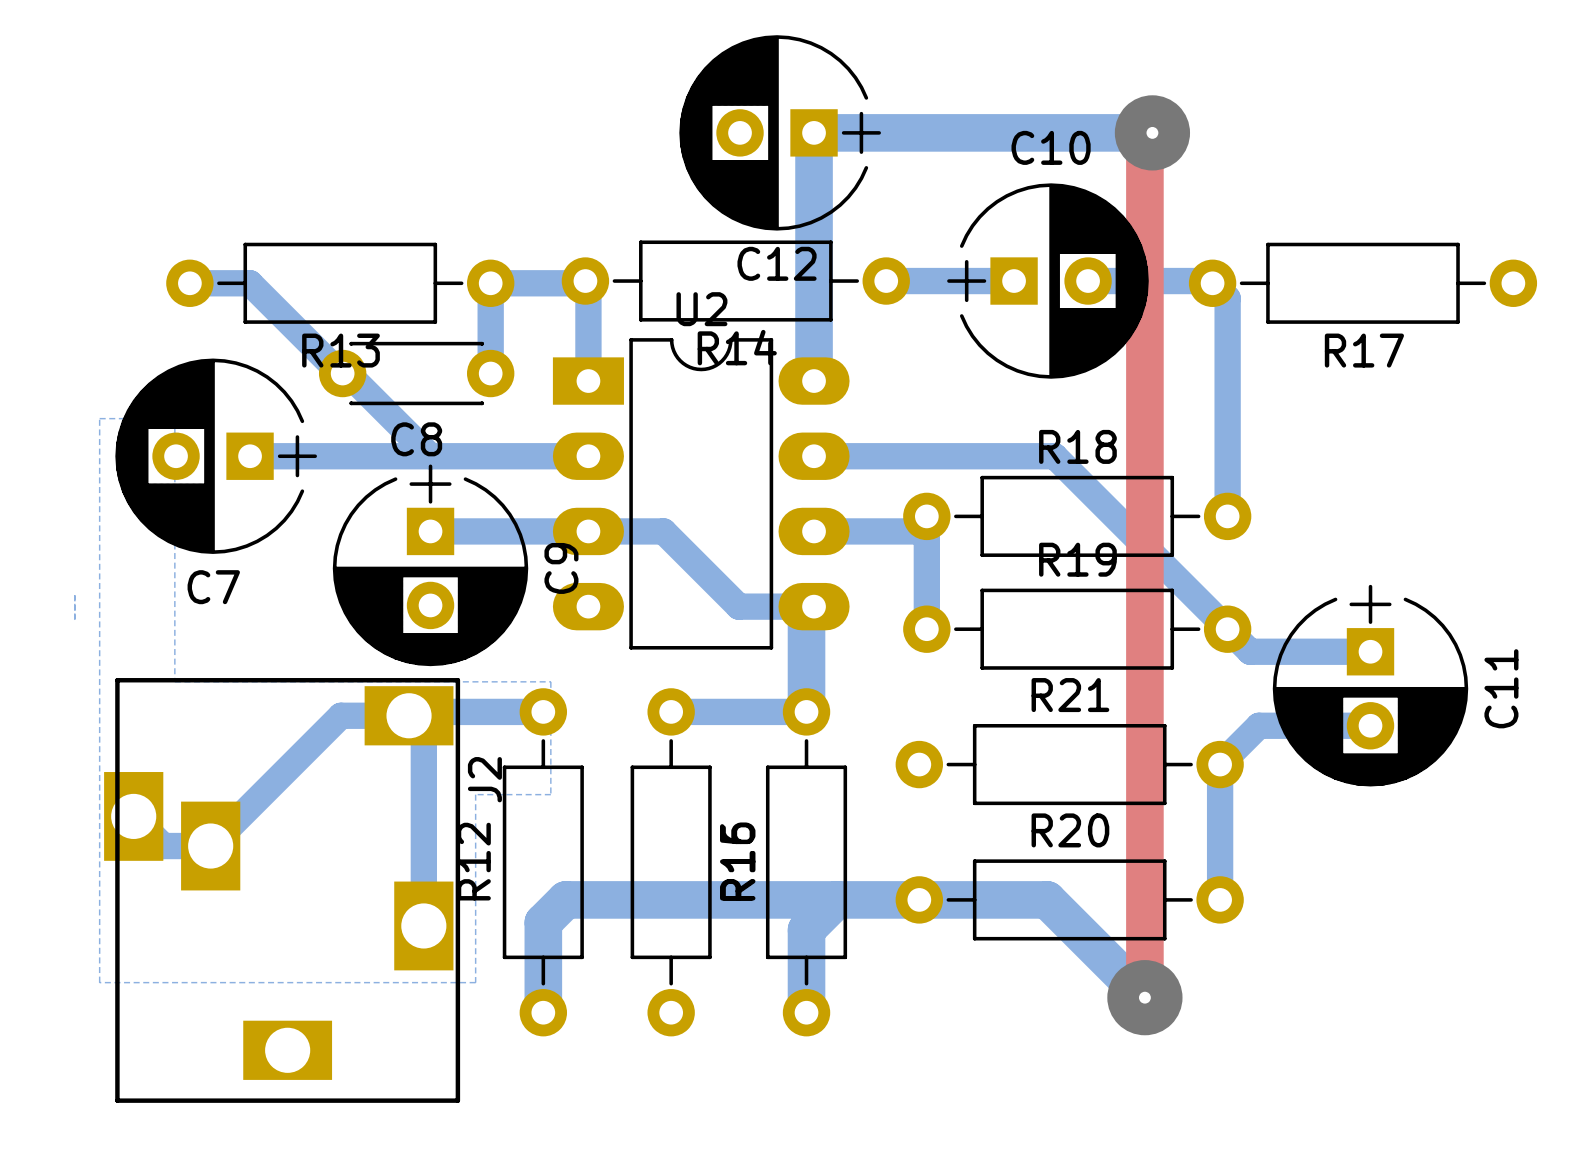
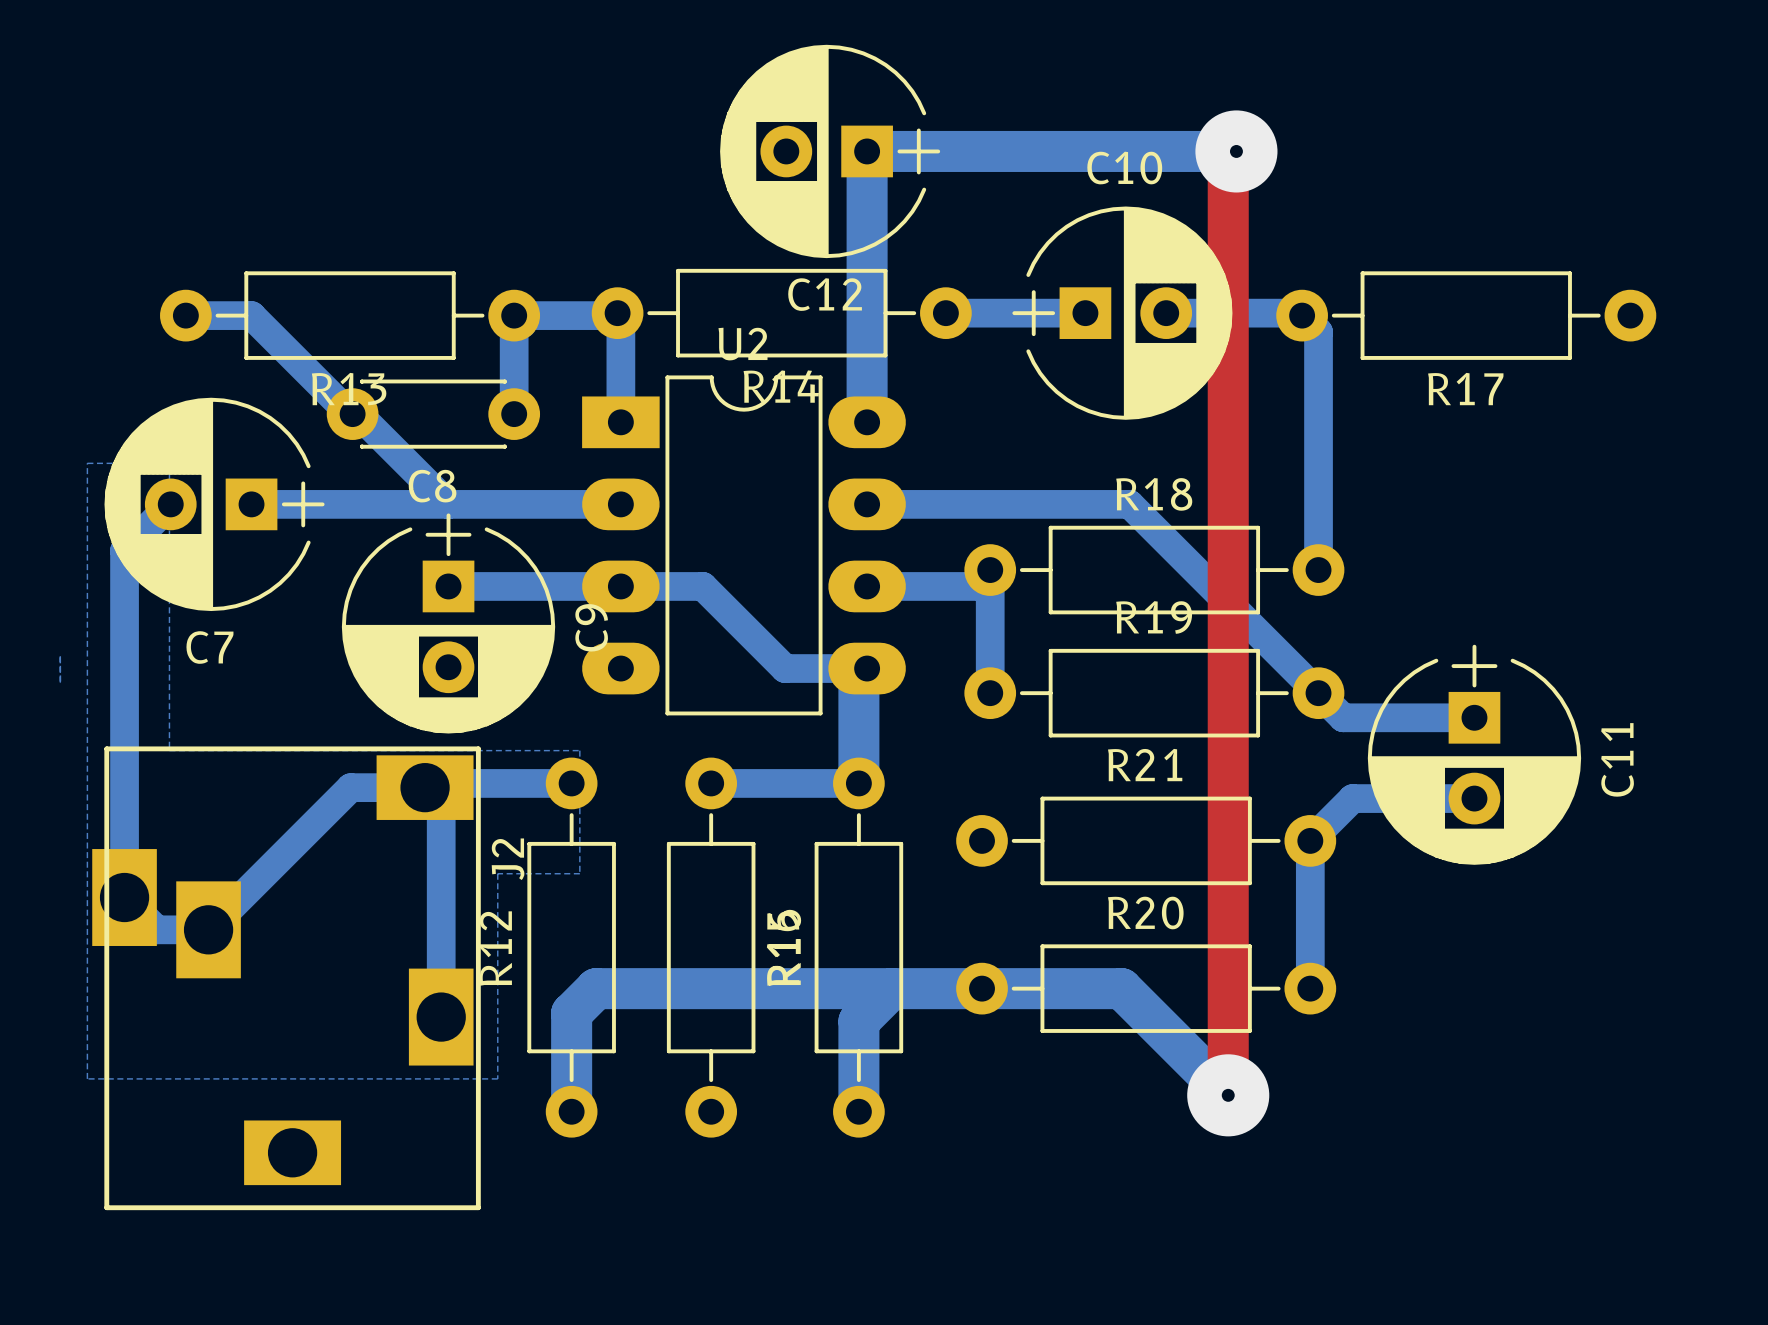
bottom track: none -> (170, 504) (124, 550) (124, 897)

